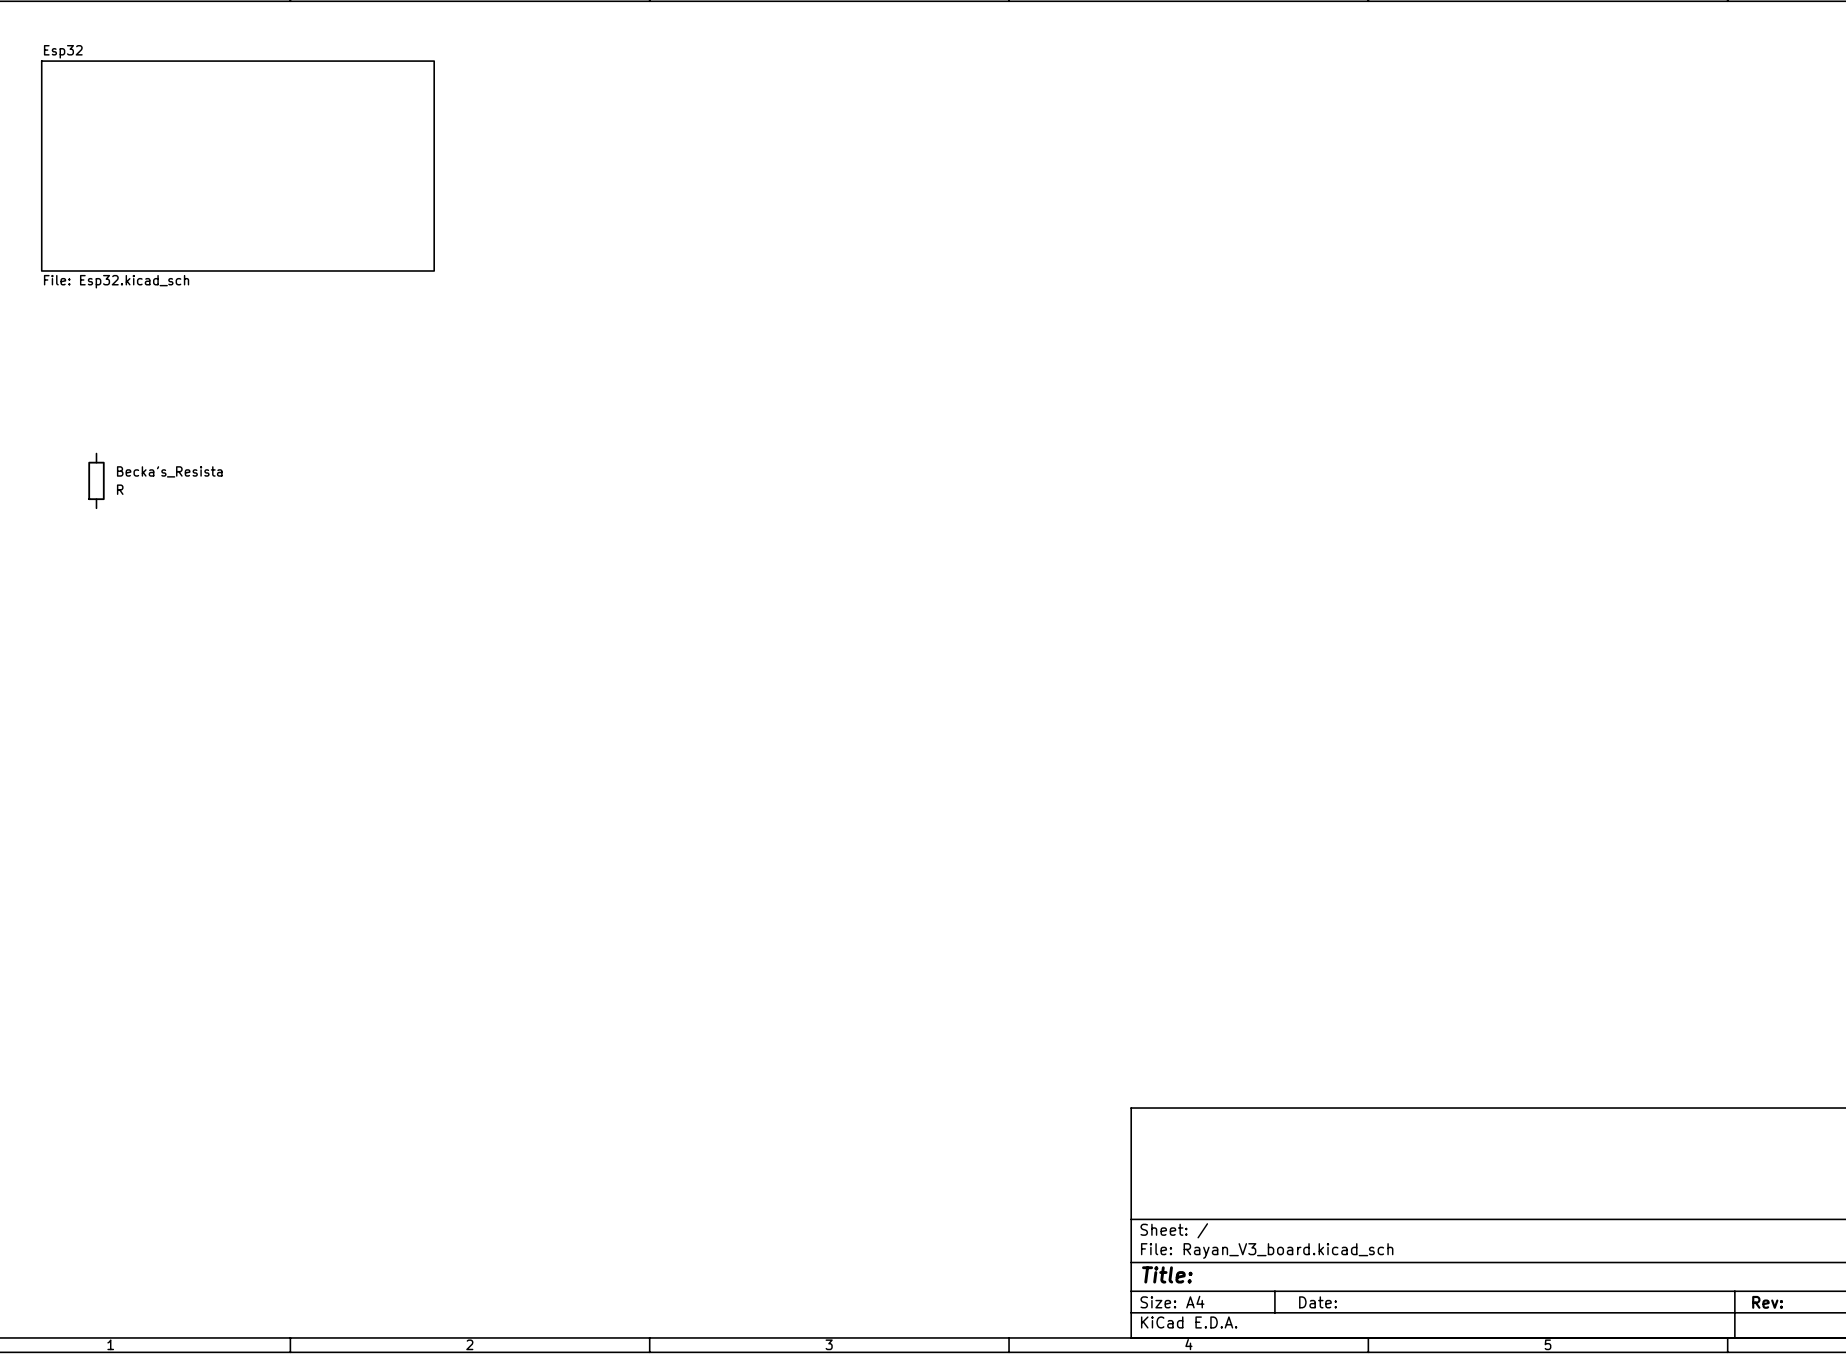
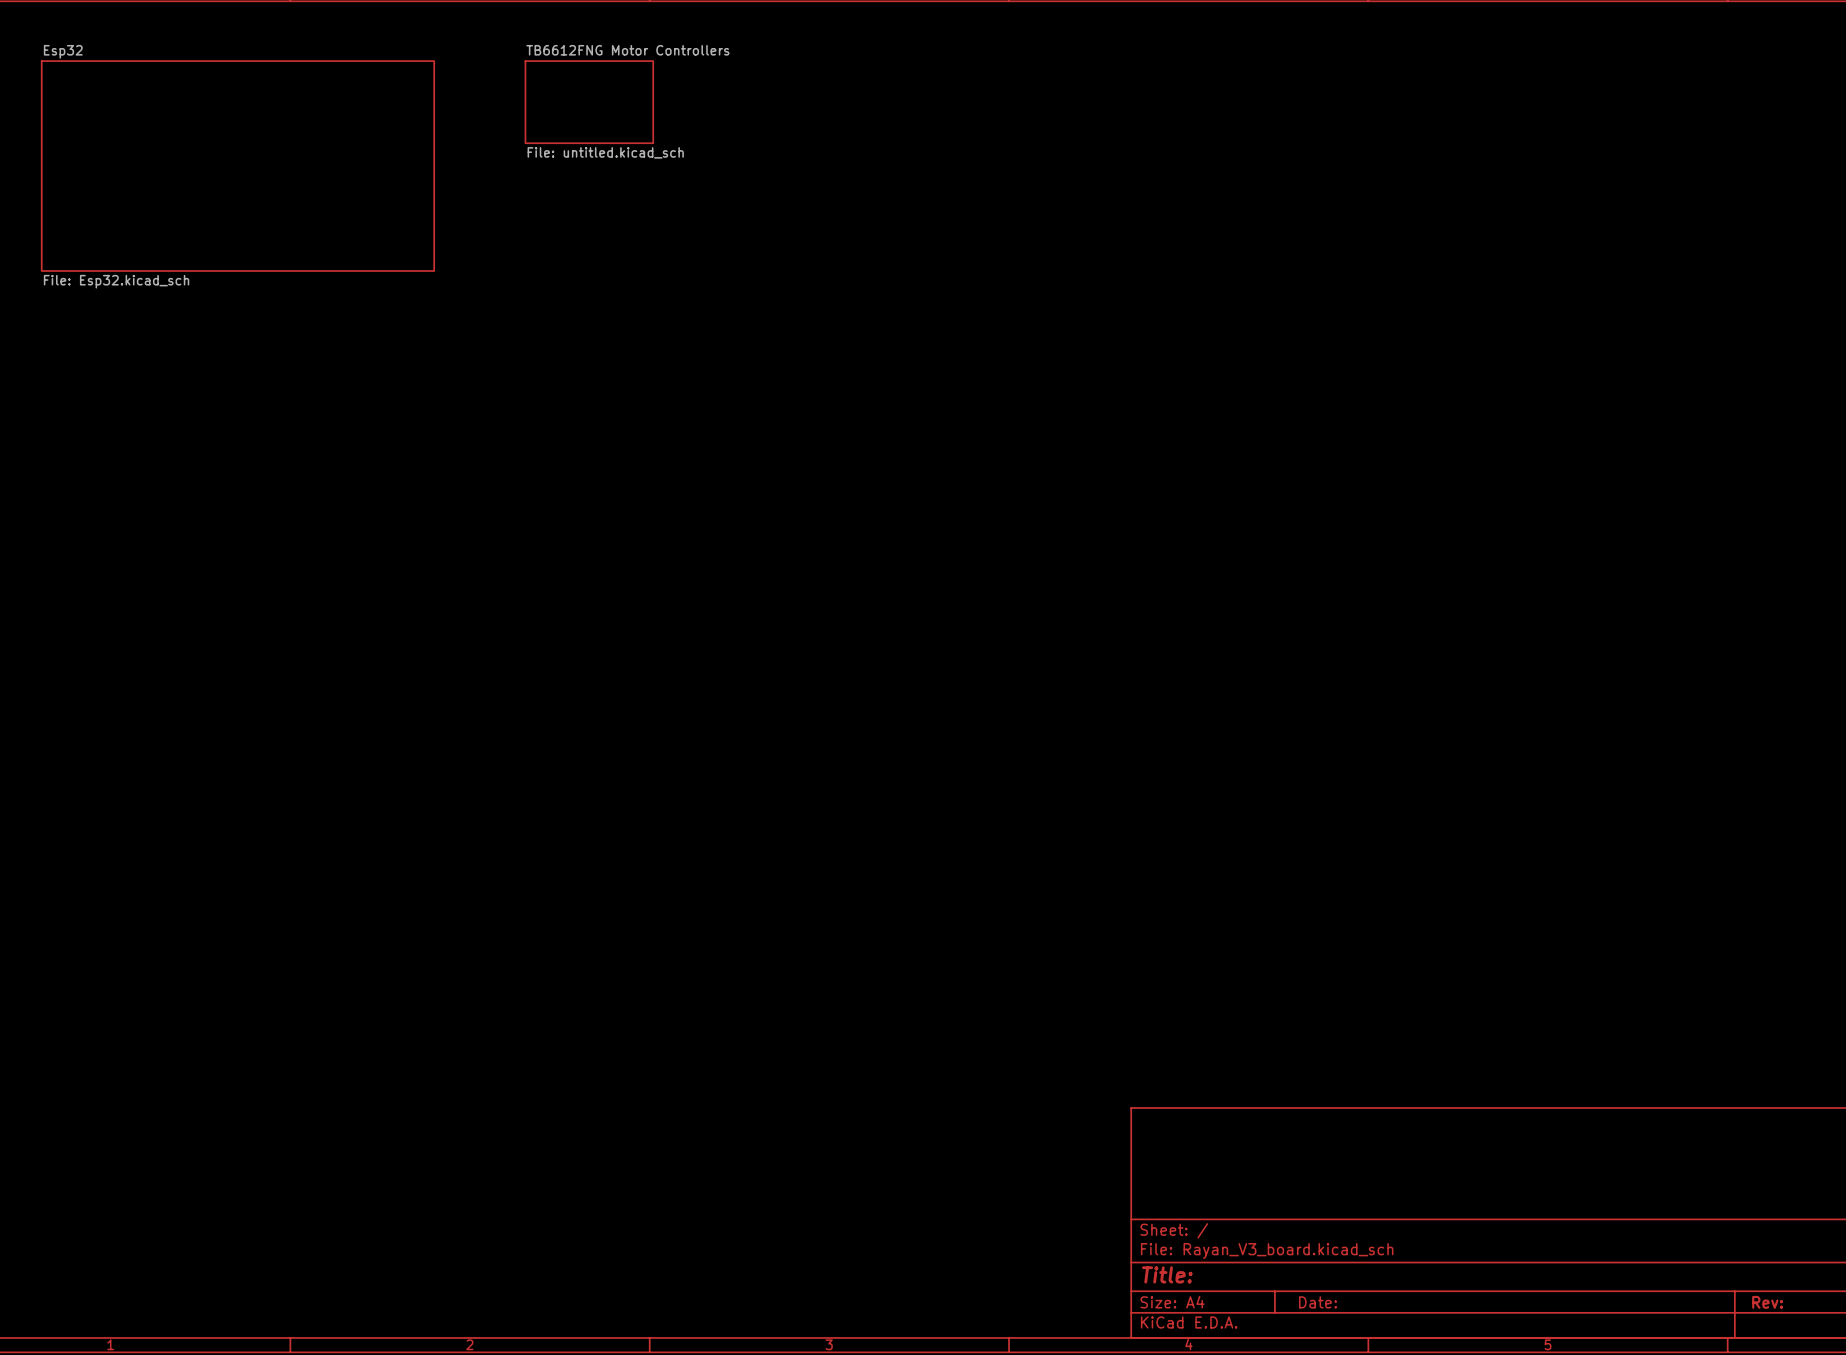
sheet TB6612FNG Motor Controllers: none -> File: untitled.kicad_sch (589, 102)
Becka's_Resista: R (96, 480) -> none

